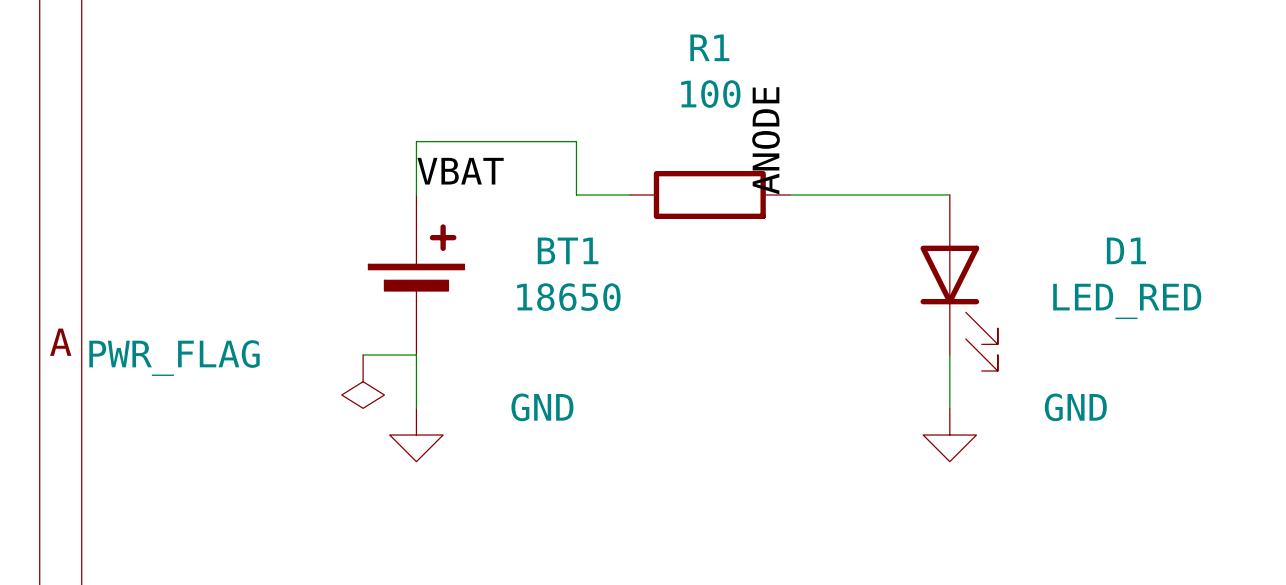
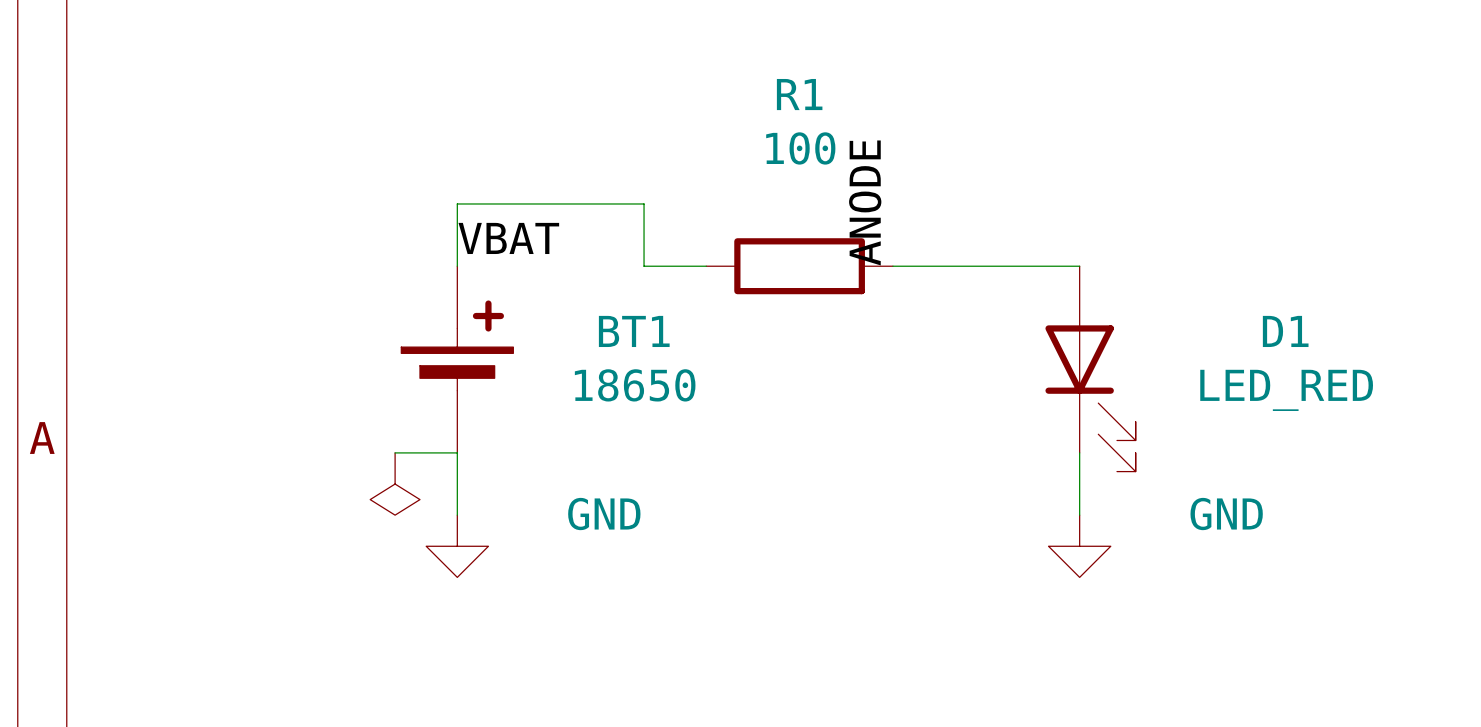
power symbol text: PWR_FLAG (174, 358) -> none

